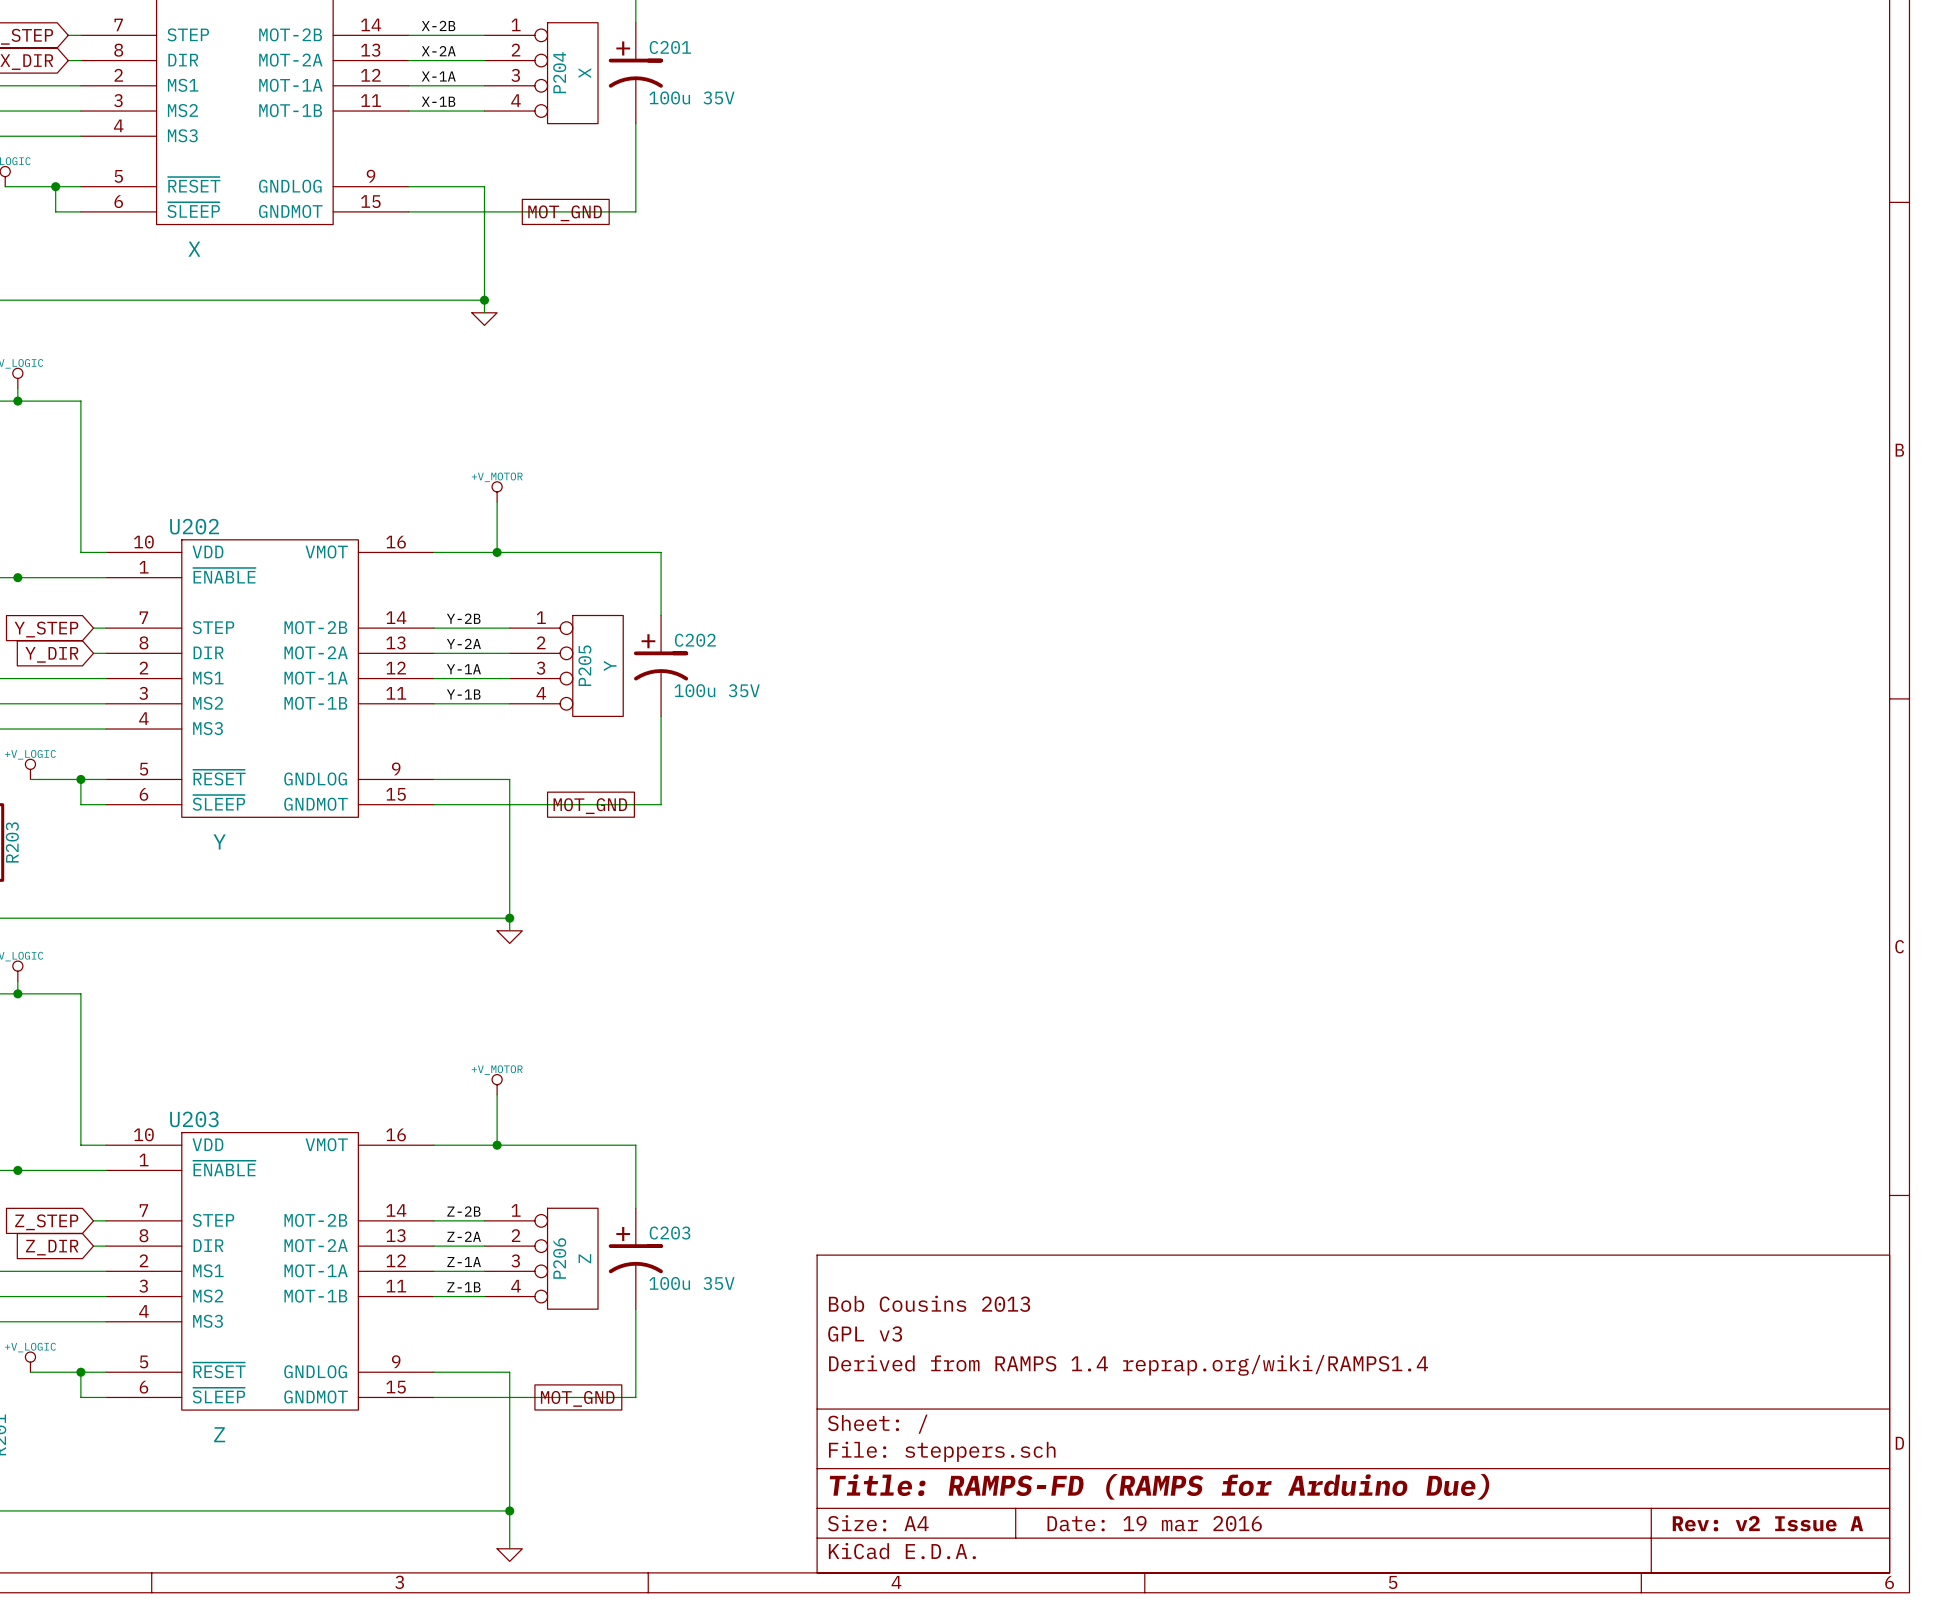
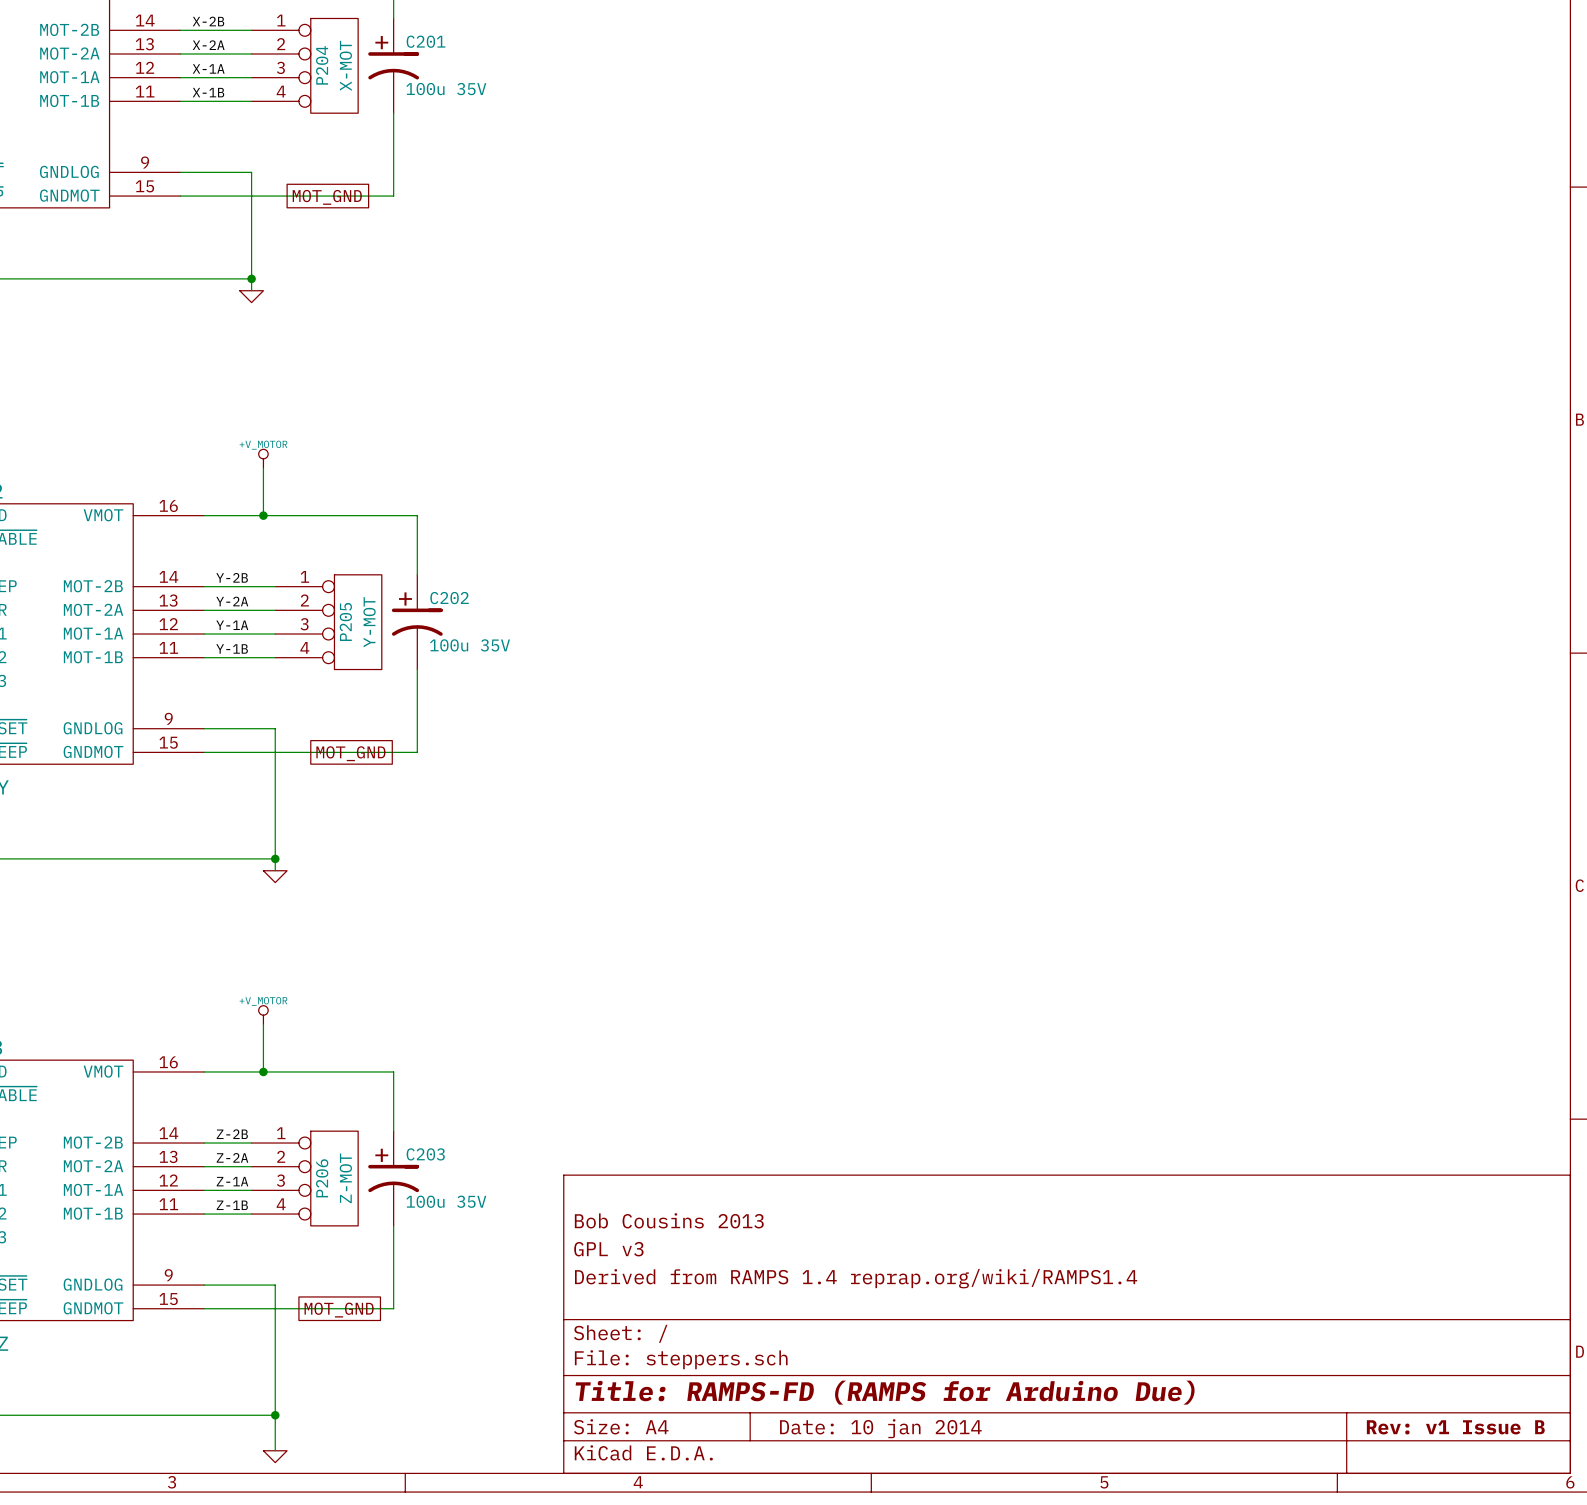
P204 value: X (584, 73) -> X-MOT (345, 65)
P205 value: Y (610, 665) -> Y-MOT (369, 622)
P206 value: Z (584, 1258) -> Z-MOT (345, 1178)
title block: Date: 19 mar 2016 (1154, 1523) -> Date: 10 jan 2014 (880, 1428)
title block: Rev: v2 Issue A (1767, 1523) -> Rev: v1 Issue B (1455, 1427)

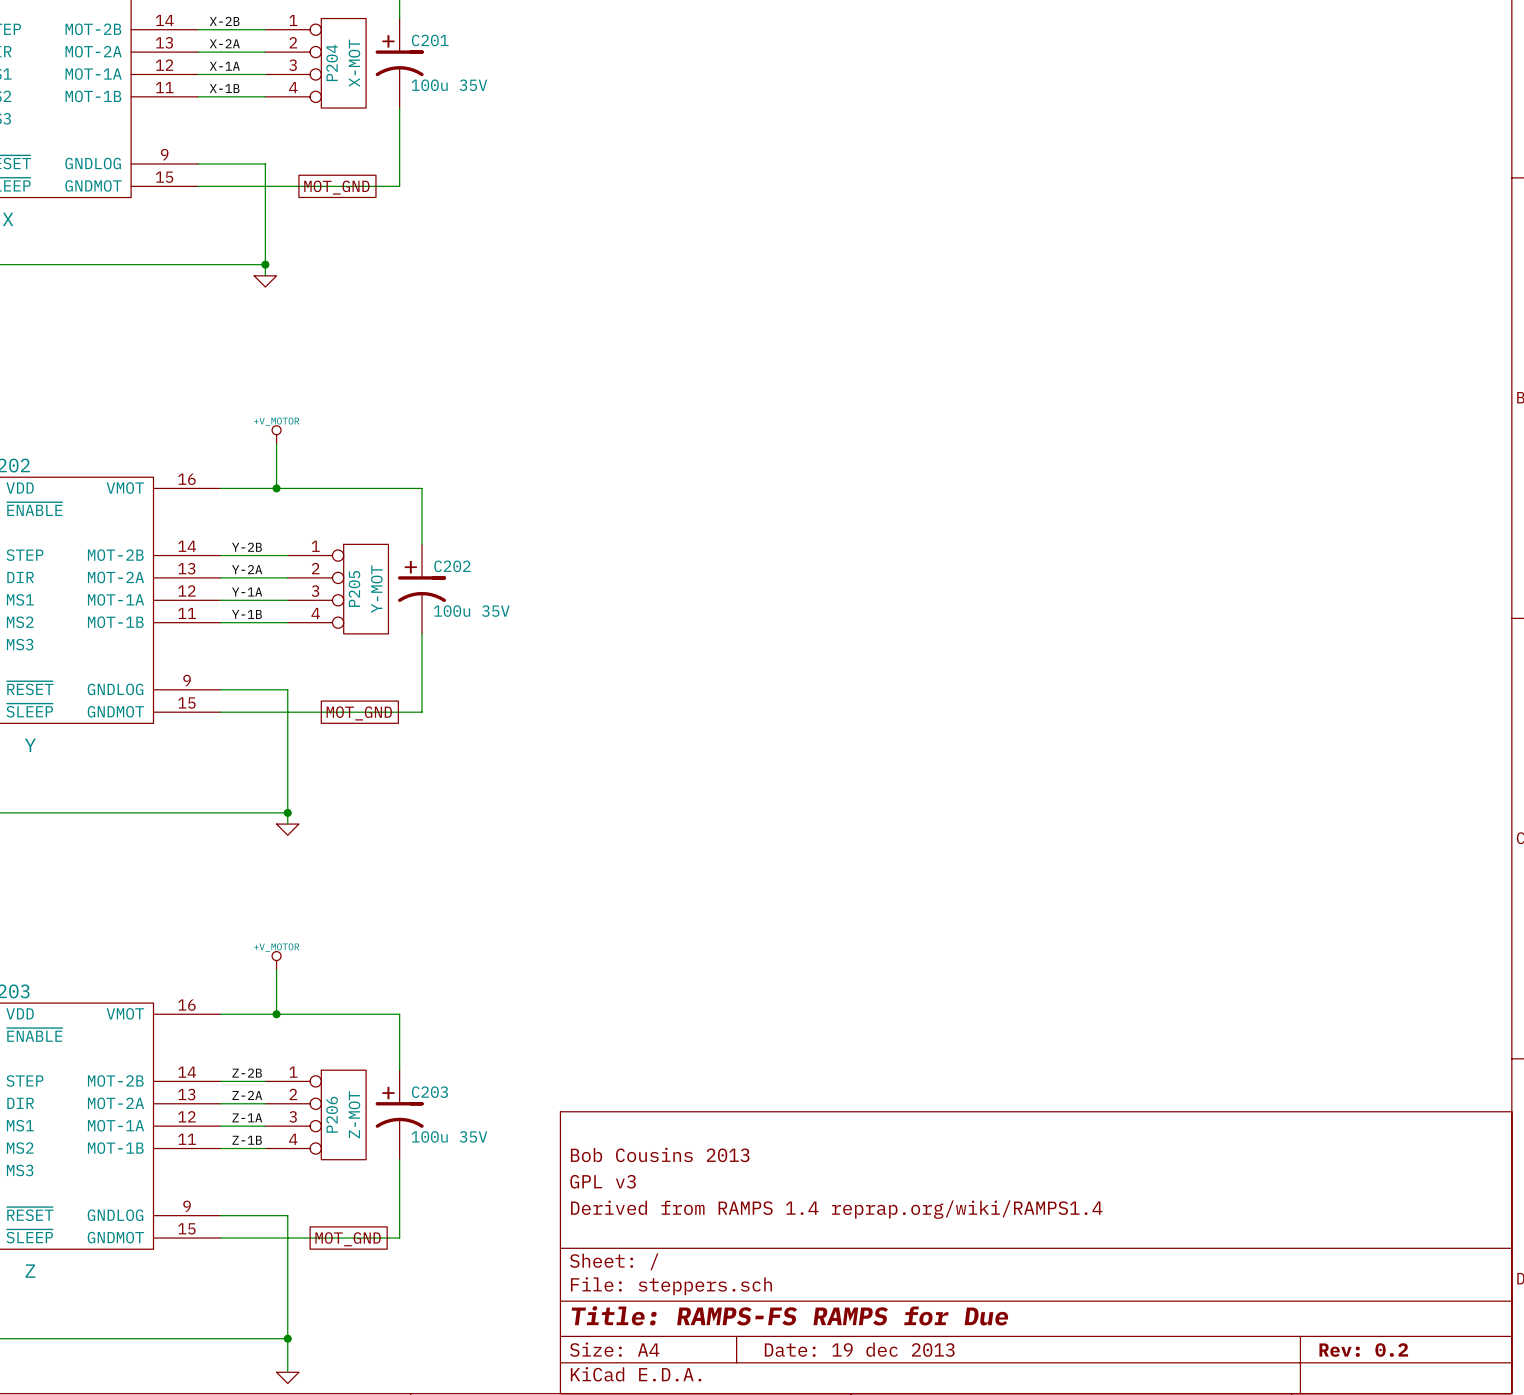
title block: Title: RAMPS-FD (RAMPS for Arduino Due) (885, 1392) -> Title: RAMPS-FS RAMPS for Due (789, 1315)
title block: Rev: v1 Issue B (1455, 1427) -> Rev: 0.2 (1363, 1350)
title block: Date: 10 jan 2014 (880, 1428) -> Date: 19 dec 2013 (859, 1349)

